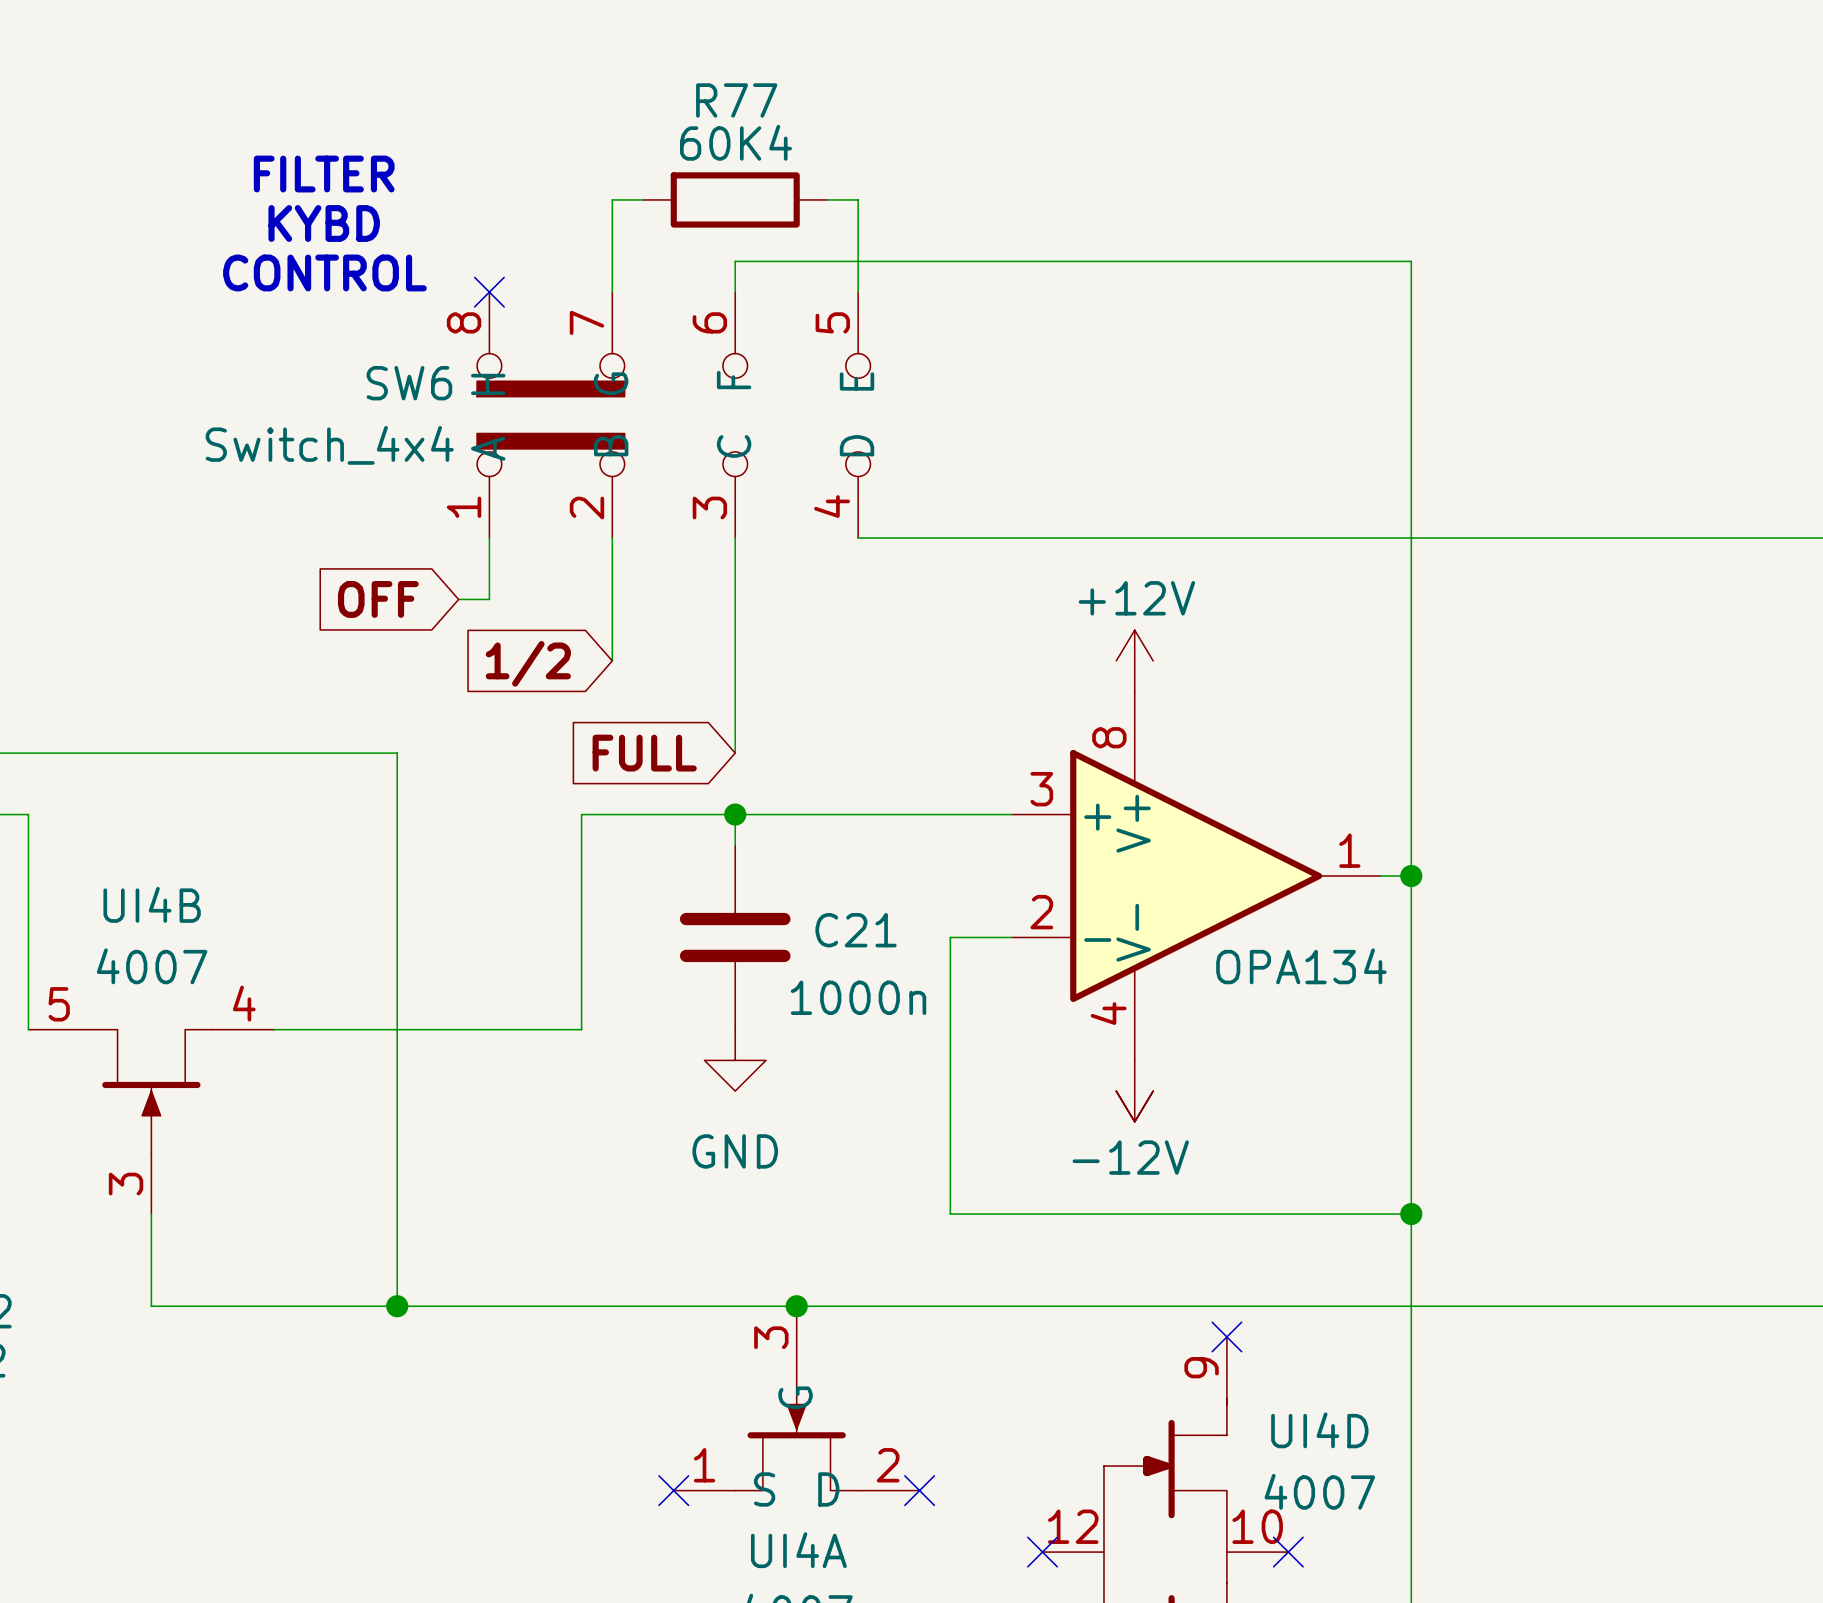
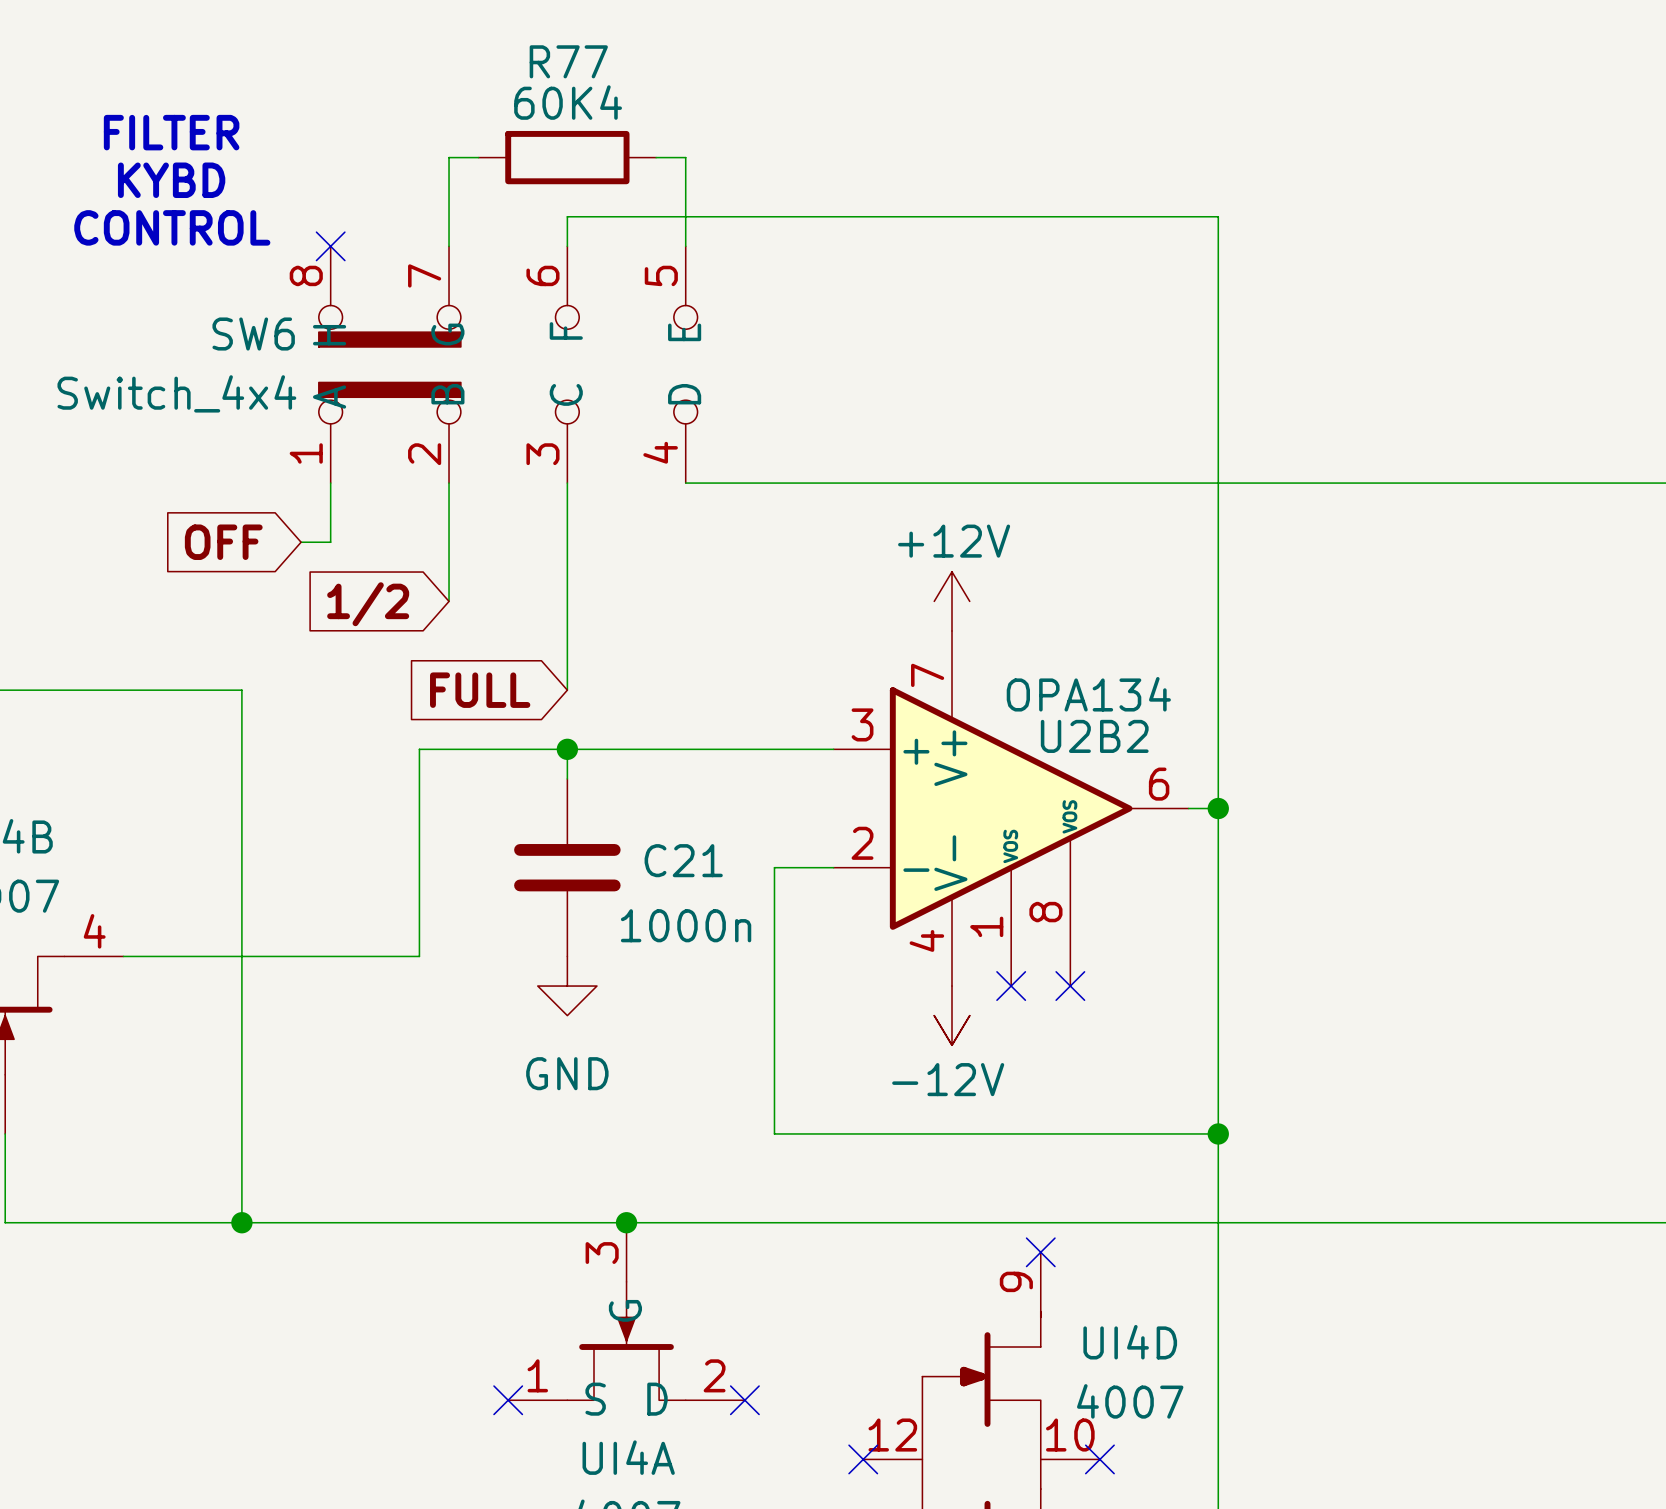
part: (1134, 876) -> none
part: OPA134 (1196, 876) -> none
U2B2: none -> OPA134 (1011, 808)
no-connect mark: none -> (1011, 986)
no-connect mark: none -> (1070, 986)

